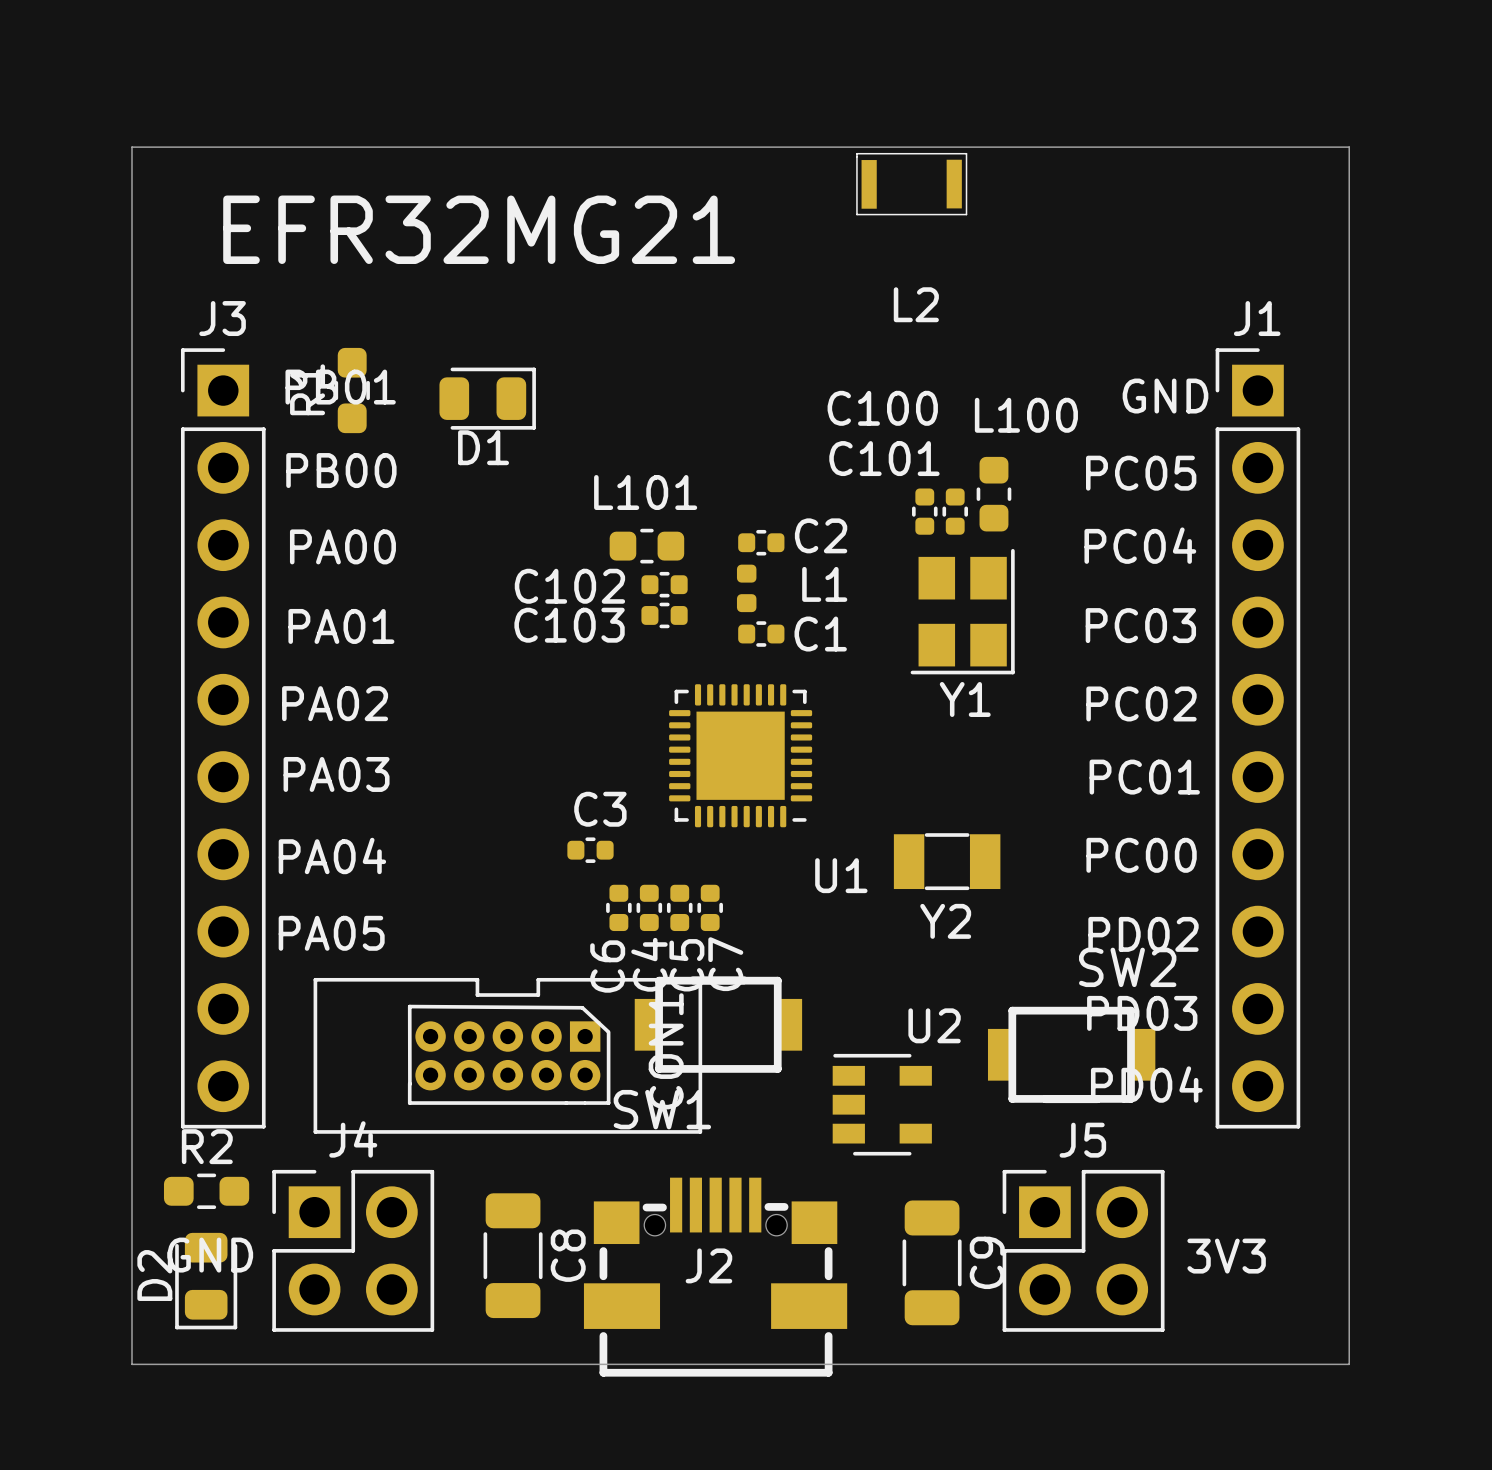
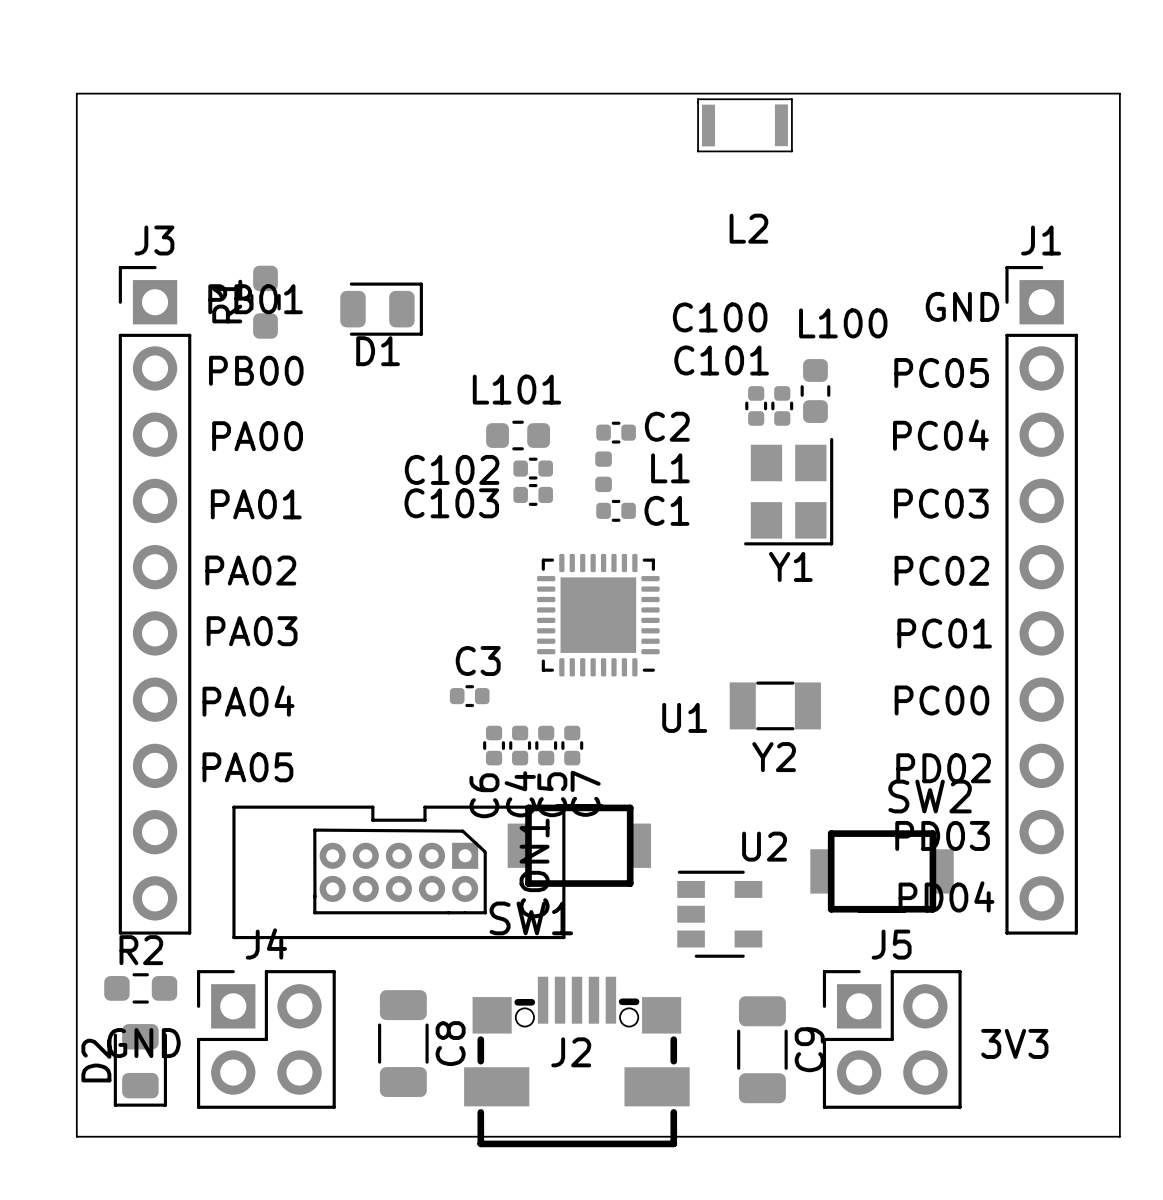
text: EFR32MG21 (479, 229) -> none

